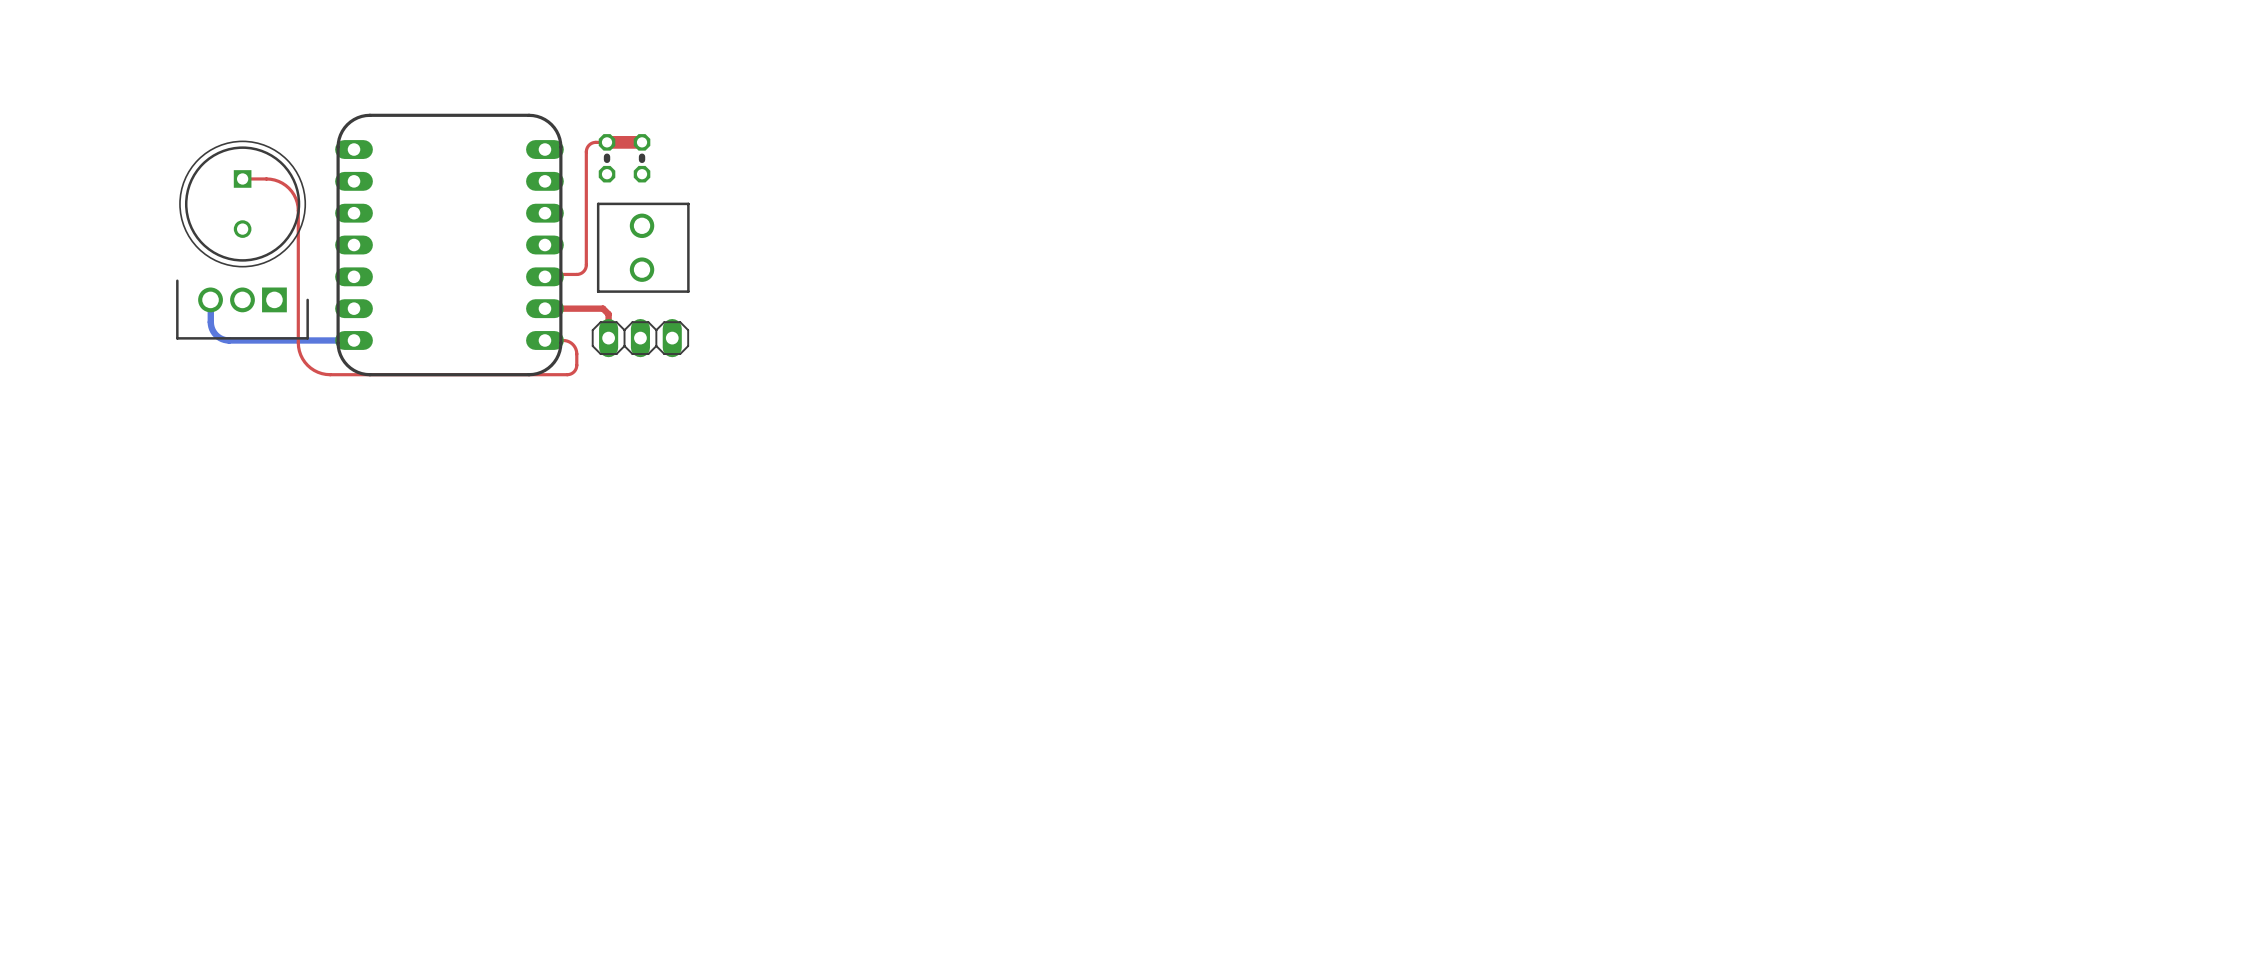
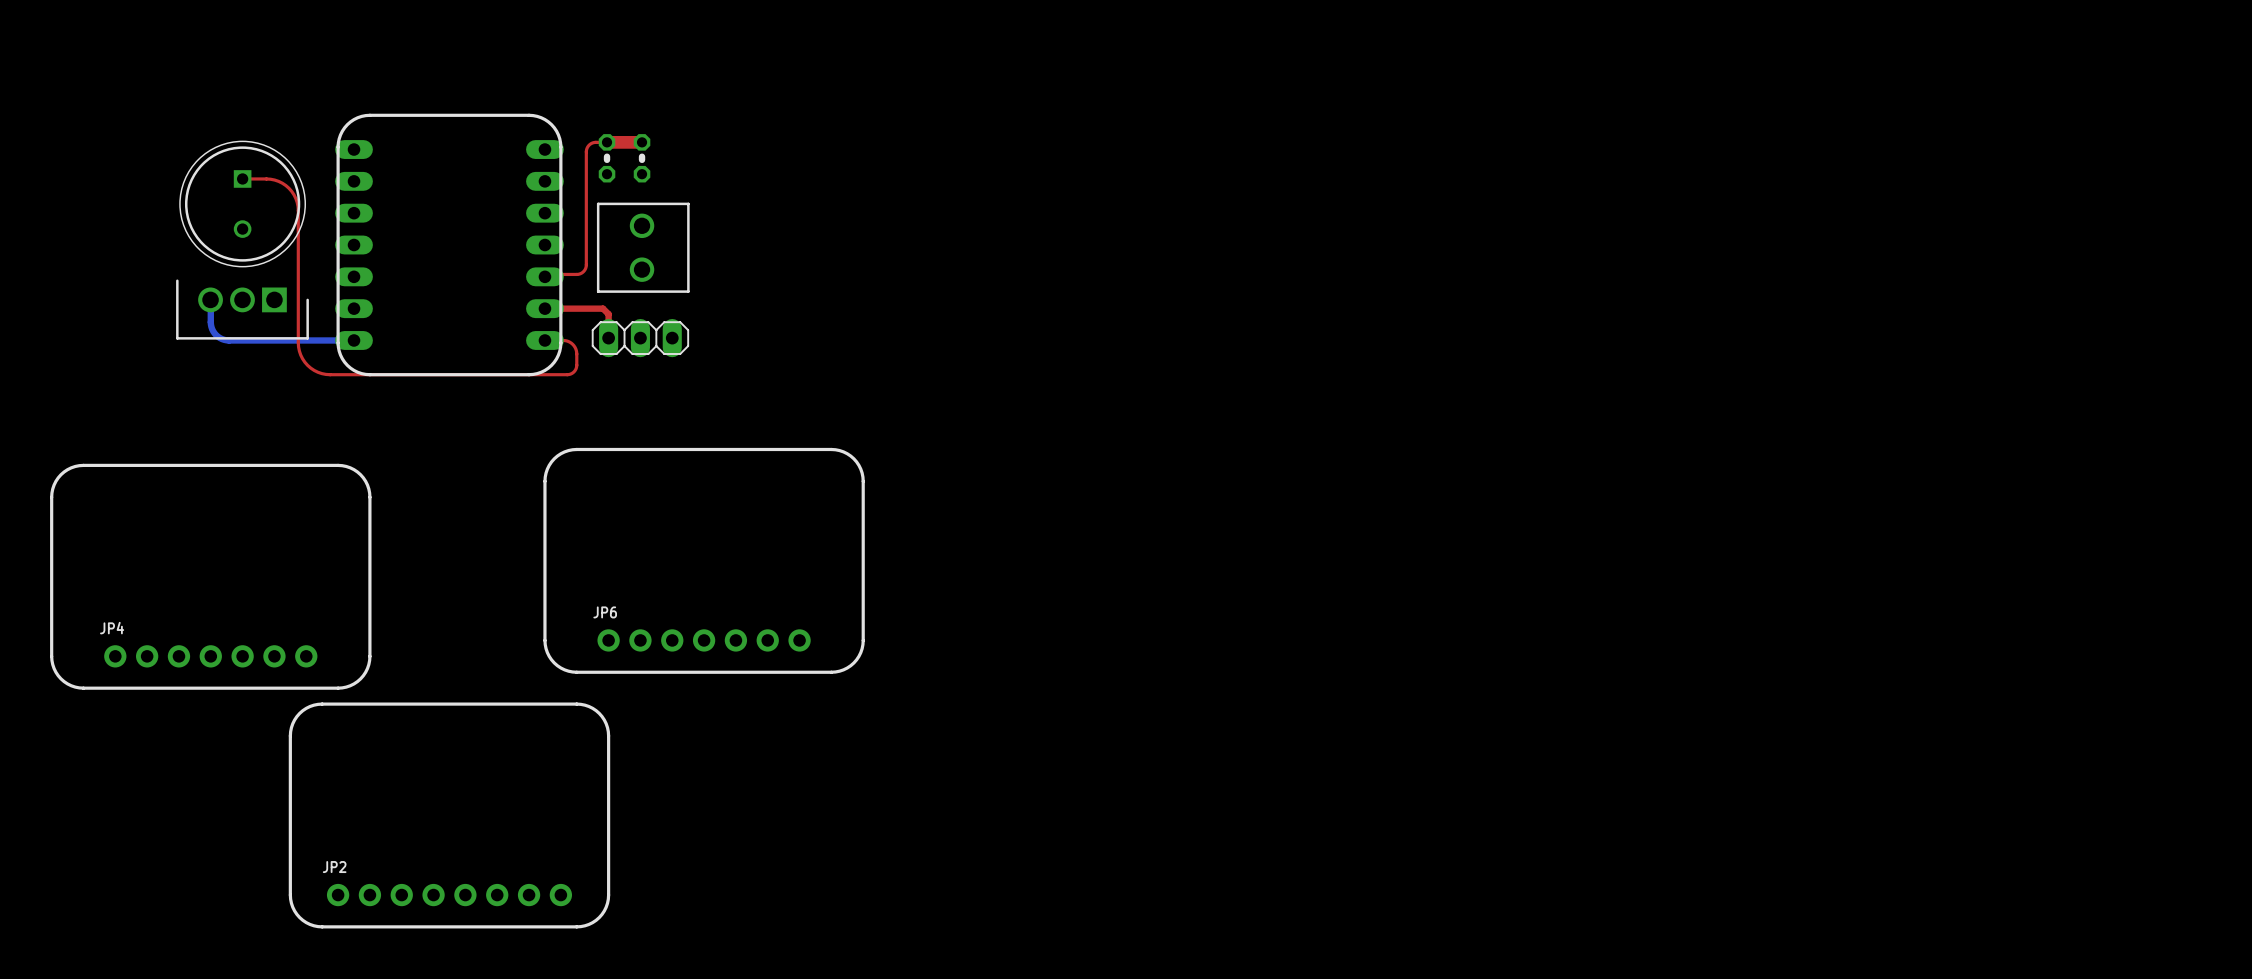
line: none -> (576, 449) (831, 449) (839, 450) (850, 456) (860, 469) (863, 481) (863, 640) (862, 648) (856, 659) (843, 669) (831, 672) (576, 672) (568, 671) (557, 665) (547, 652) (544, 640) (545, 477) (547, 469) (554, 458) (564, 451) (576, 449)
line: none -> (83, 465) (338, 465) (346, 466) (357, 471) (367, 485) (369, 497) (369, 656) (368, 664) (363, 675) (350, 685) (338, 688) (83, 688) (75, 687) (64, 681) (54, 668) (51, 656) (51, 493) (54, 485) (60, 474) (71, 467) (83, 465)
JP6: none -> (704, 640)
JP4: none -> (210, 656)
line: none -> (322, 704) (576, 704) (585, 705) (596, 710) (606, 723) (608, 735) (608, 895) (607, 903) (602, 914) (588, 924) (576, 926) (322, 926) (313, 925) (302, 920) (292, 907) (290, 895) (290, 731) (292, 723) (299, 713) (310, 706) (322, 704)
JP2: none -> (449, 895)

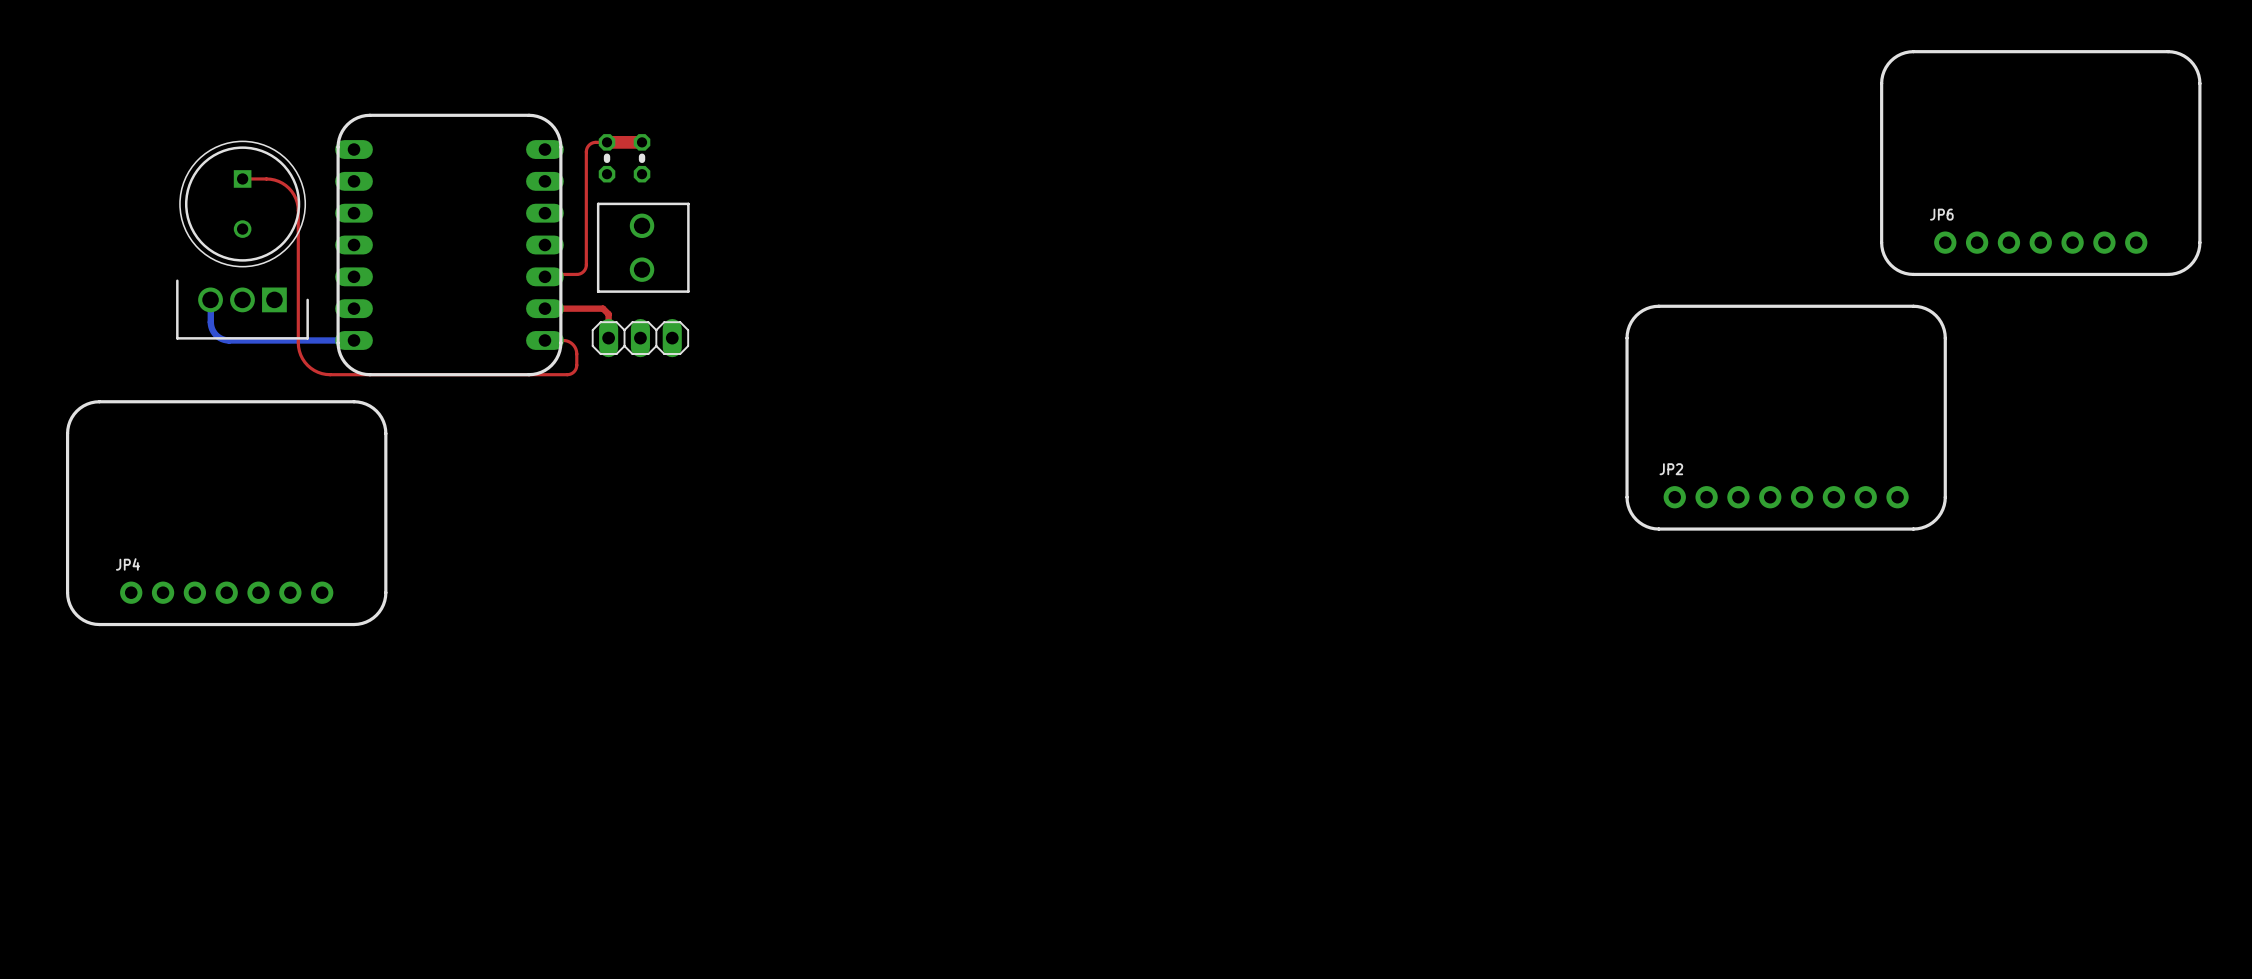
line: none -> (1913, 51) (2168, 51) (2176, 52) (2187, 58) (2197, 71) (2199, 83) (2199, 242) (2198, 250) (2193, 261) (2180, 272) (2168, 274) (1913, 274) (1905, 273) (1894, 267) (1884, 254) (1881, 242) (1881, 79) (1884, 71) (1890, 60) (1901, 54) (1913, 51)
line: none -> (1658, 306) (1913, 306) (1921, 307) (1932, 312) (1942, 325) (1945, 338) (1945, 497) (1944, 505) (1938, 516) (1925, 526) (1913, 529) (1658, 529) (1650, 527) (1639, 522) (1629, 509) (1627, 497) (1627, 333) (1629, 325) (1636, 315) (1646, 308) (1658, 306)
line: (576, 449) (831, 449) (839, 450) (850, 456) (860, 469) (863, 481) (863, 640) (862, 648) (856, 659) (843, 669) (831, 672) (576, 672) (568, 671) (557, 665) (547, 652) (544, 640) (545, 477) (547, 469) (554, 458) (564, 451) (576, 449) -> none
line: (83, 465) (338, 465) (346, 466) (357, 471) (367, 485) (369, 497) (369, 656) (368, 664) (363, 675) (350, 685) (338, 688) (83, 688) (75, 687) (64, 681) (54, 668) (51, 656) (51, 493) (54, 485) (60, 474) (71, 467) (83, 465) -> (99, 401) (354, 401) (362, 402) (373, 408) (383, 421) (385, 433) (385, 592) (384, 600) (379, 612) (366, 622) (354, 624) (99, 624) (91, 623) (80, 617) (70, 604) (67, 592) (67, 429) (70, 421) (76, 411) (87, 404) (99, 401)
JP6 position: (704, 640) -> (2040, 242)
JP4 position: (210, 656) -> (226, 592)
line: (322, 704) (576, 704) (585, 705) (596, 710) (606, 723) (608, 735) (608, 895) (607, 903) (602, 914) (588, 924) (576, 926) (322, 926) (313, 925) (302, 920) (292, 907) (290, 895) (290, 731) (292, 723) (299, 713) (310, 706) (322, 704) -> none
JP2 position: (449, 895) -> (1786, 497)

